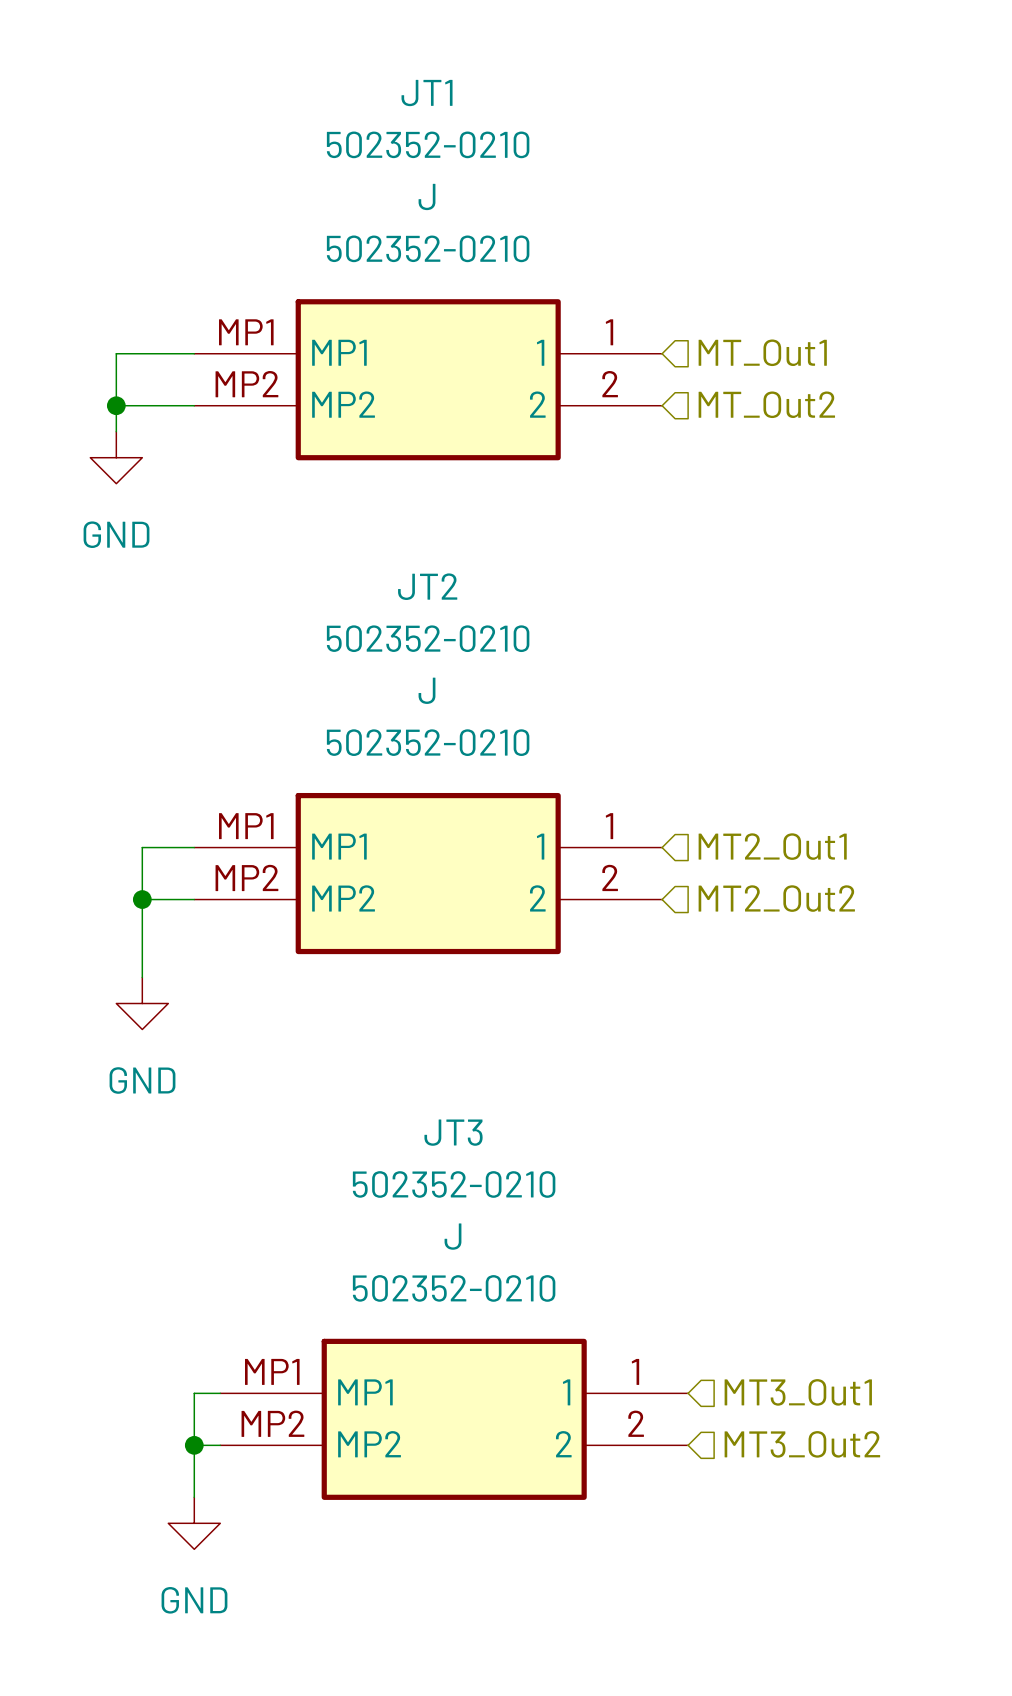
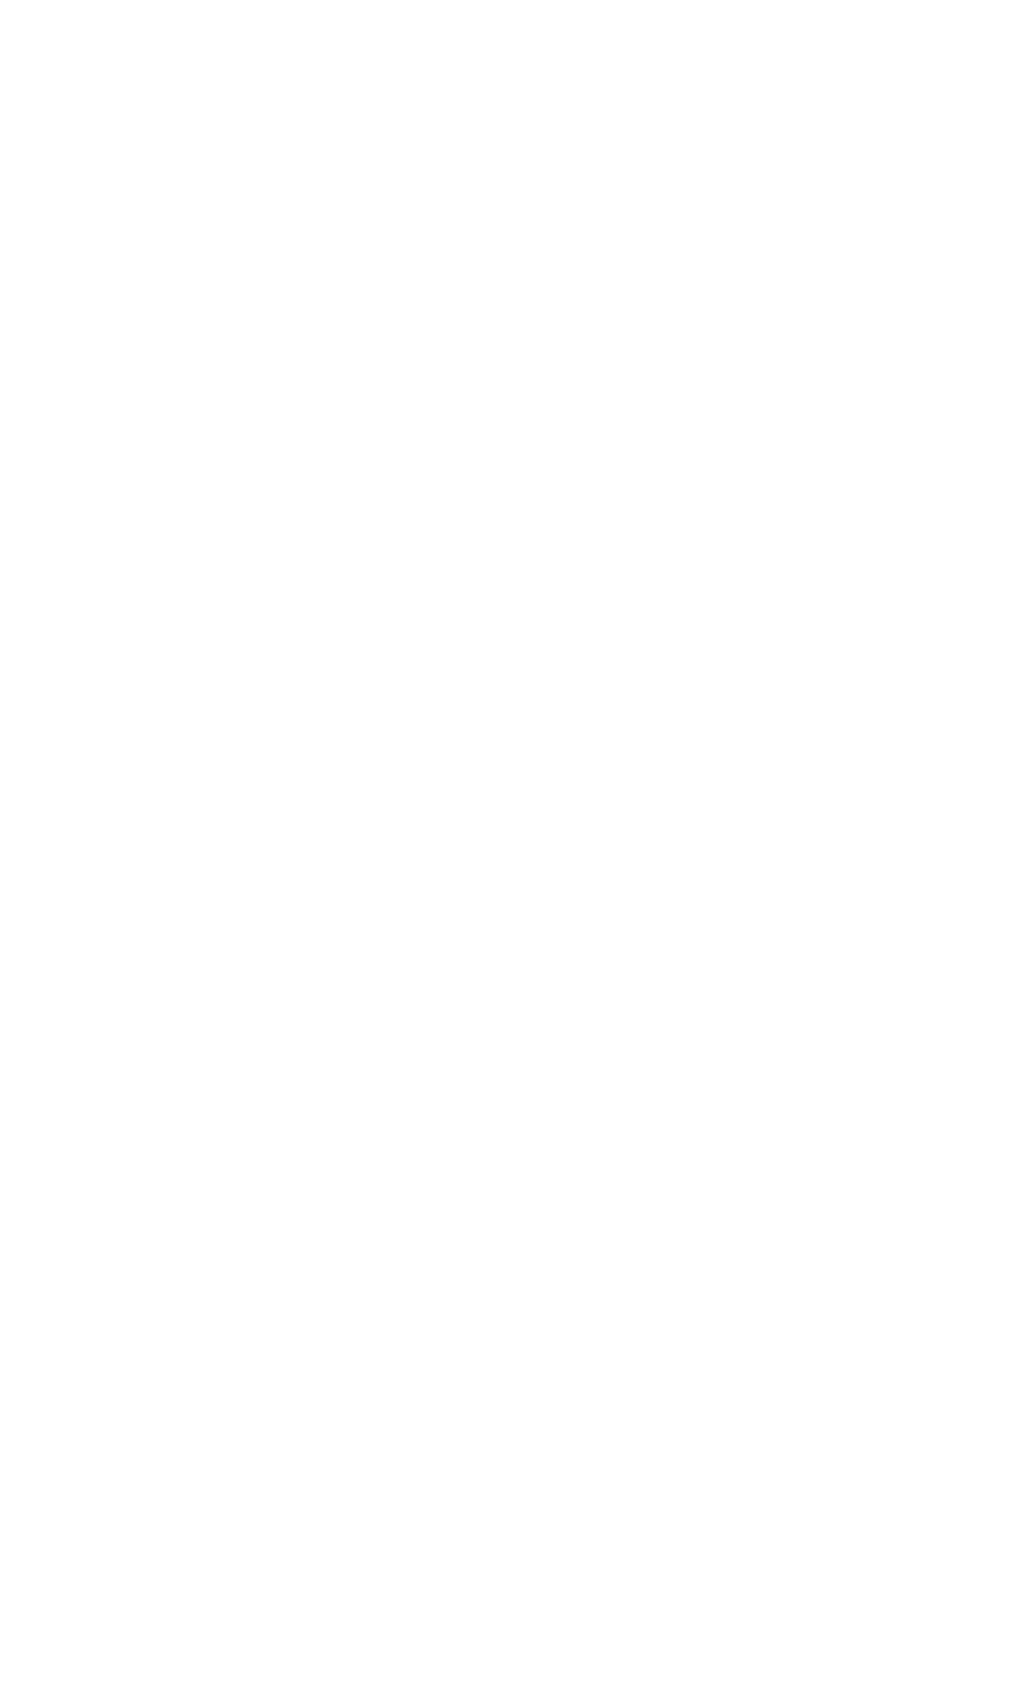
hierarchical label: MT_Out1 (762, 352) -> none
wire: (194, 353) (116, 353) (116, 431) -> none
JT1: 502352-0210 (428, 379) -> none
hierarchical label: MT_Out2 (766, 404) -> none
wire: (116, 405) (194, 405) -> none
junction: (116, 405) -> none
power symbol: GND (116, 457) -> none
hierarchical label: MT2_Out1 (772, 846) -> none
wire: (194, 847) (142, 847) (142, 977) -> none
JT2: 502352-0210 (428, 873) -> none
hierarchical label: MT2_Out2 (776, 898) -> none
wire: (142, 899) (194, 899) -> none
junction: (142, 899) -> none
power symbol: GND (142, 1003) -> none
hierarchical label: MT3_Out1 (798, 1392) -> none
wire: (220, 1393) (194, 1393) (194, 1497) -> none
JT3: 502352-0210 (454, 1419) -> none
hierarchical label: MT3_Out2 (802, 1444) -> none
wire: (194, 1445) (220, 1445) -> none
junction: (194, 1445) -> none
power symbol: GND (194, 1523) -> none

